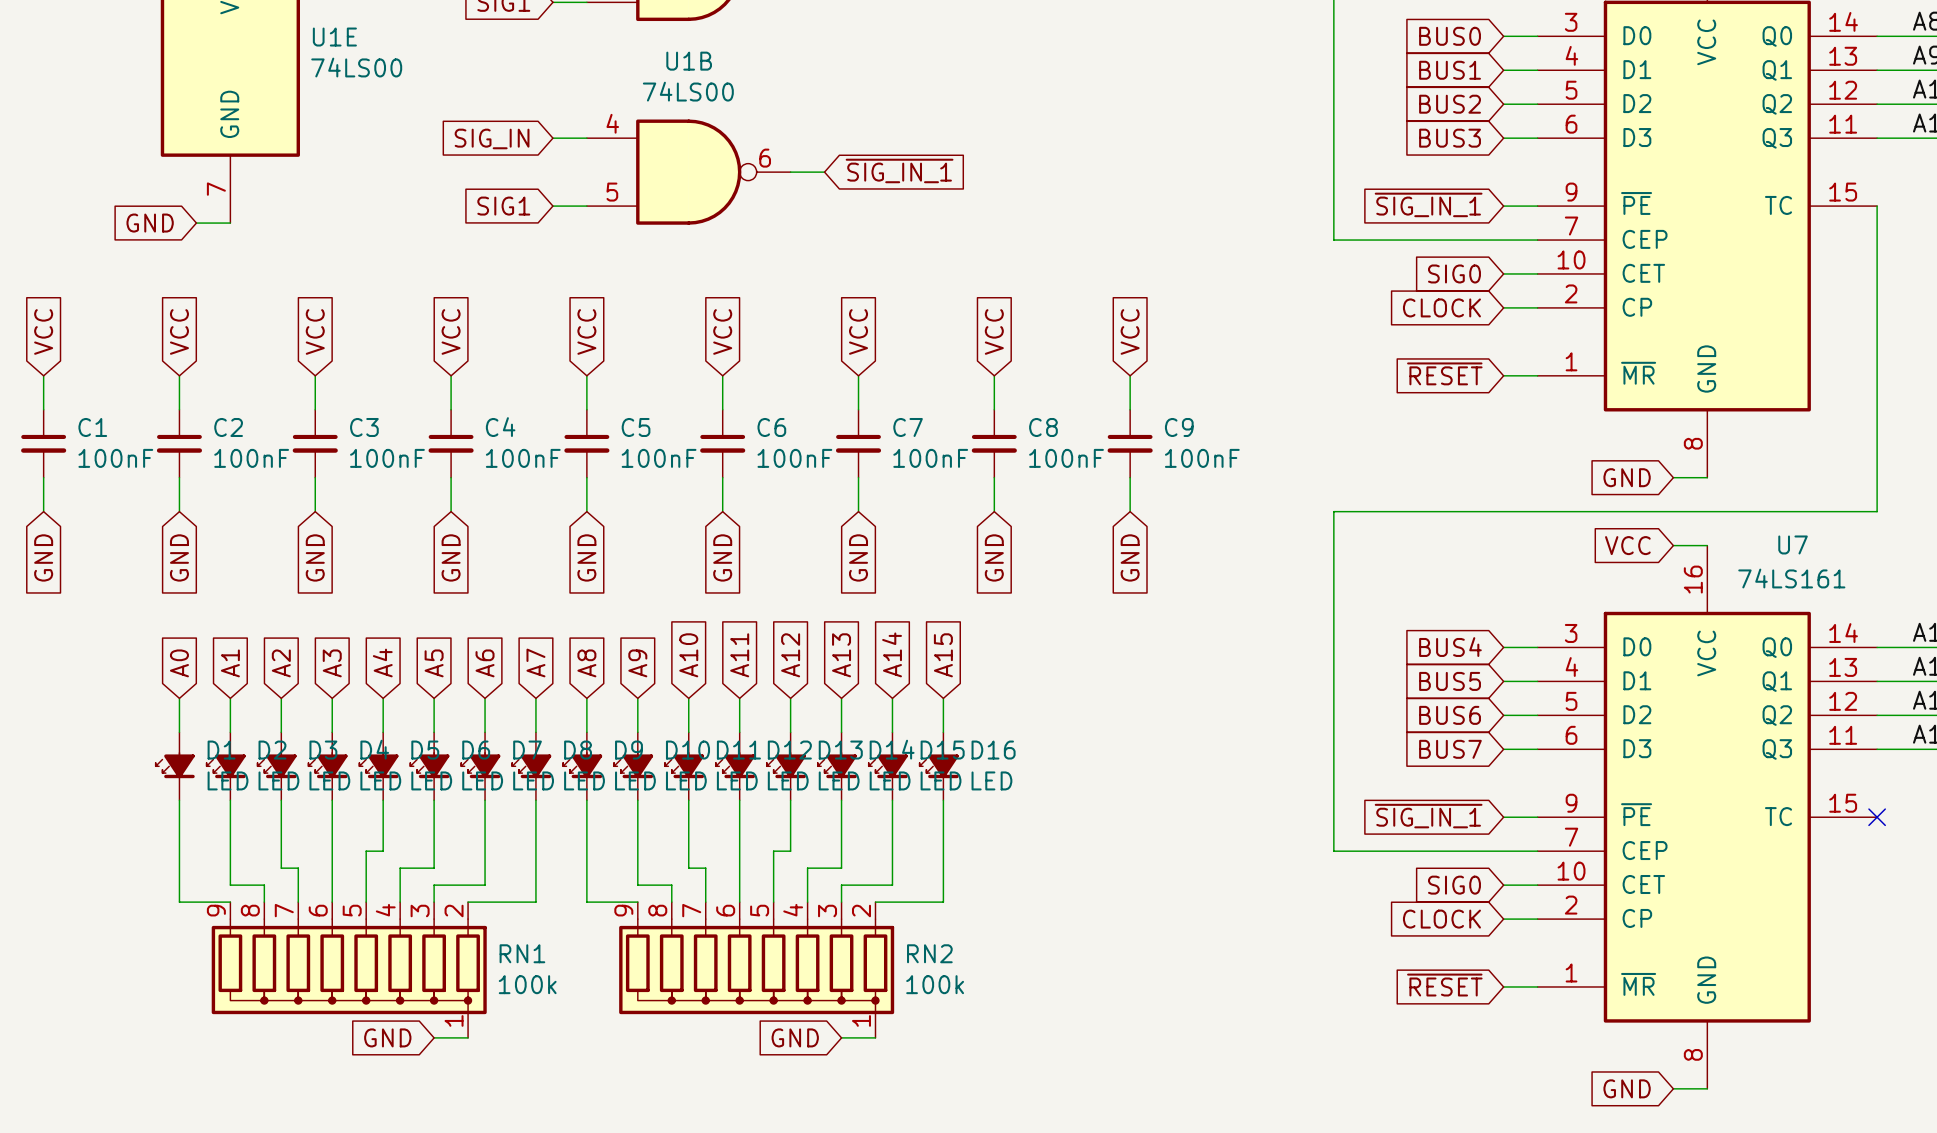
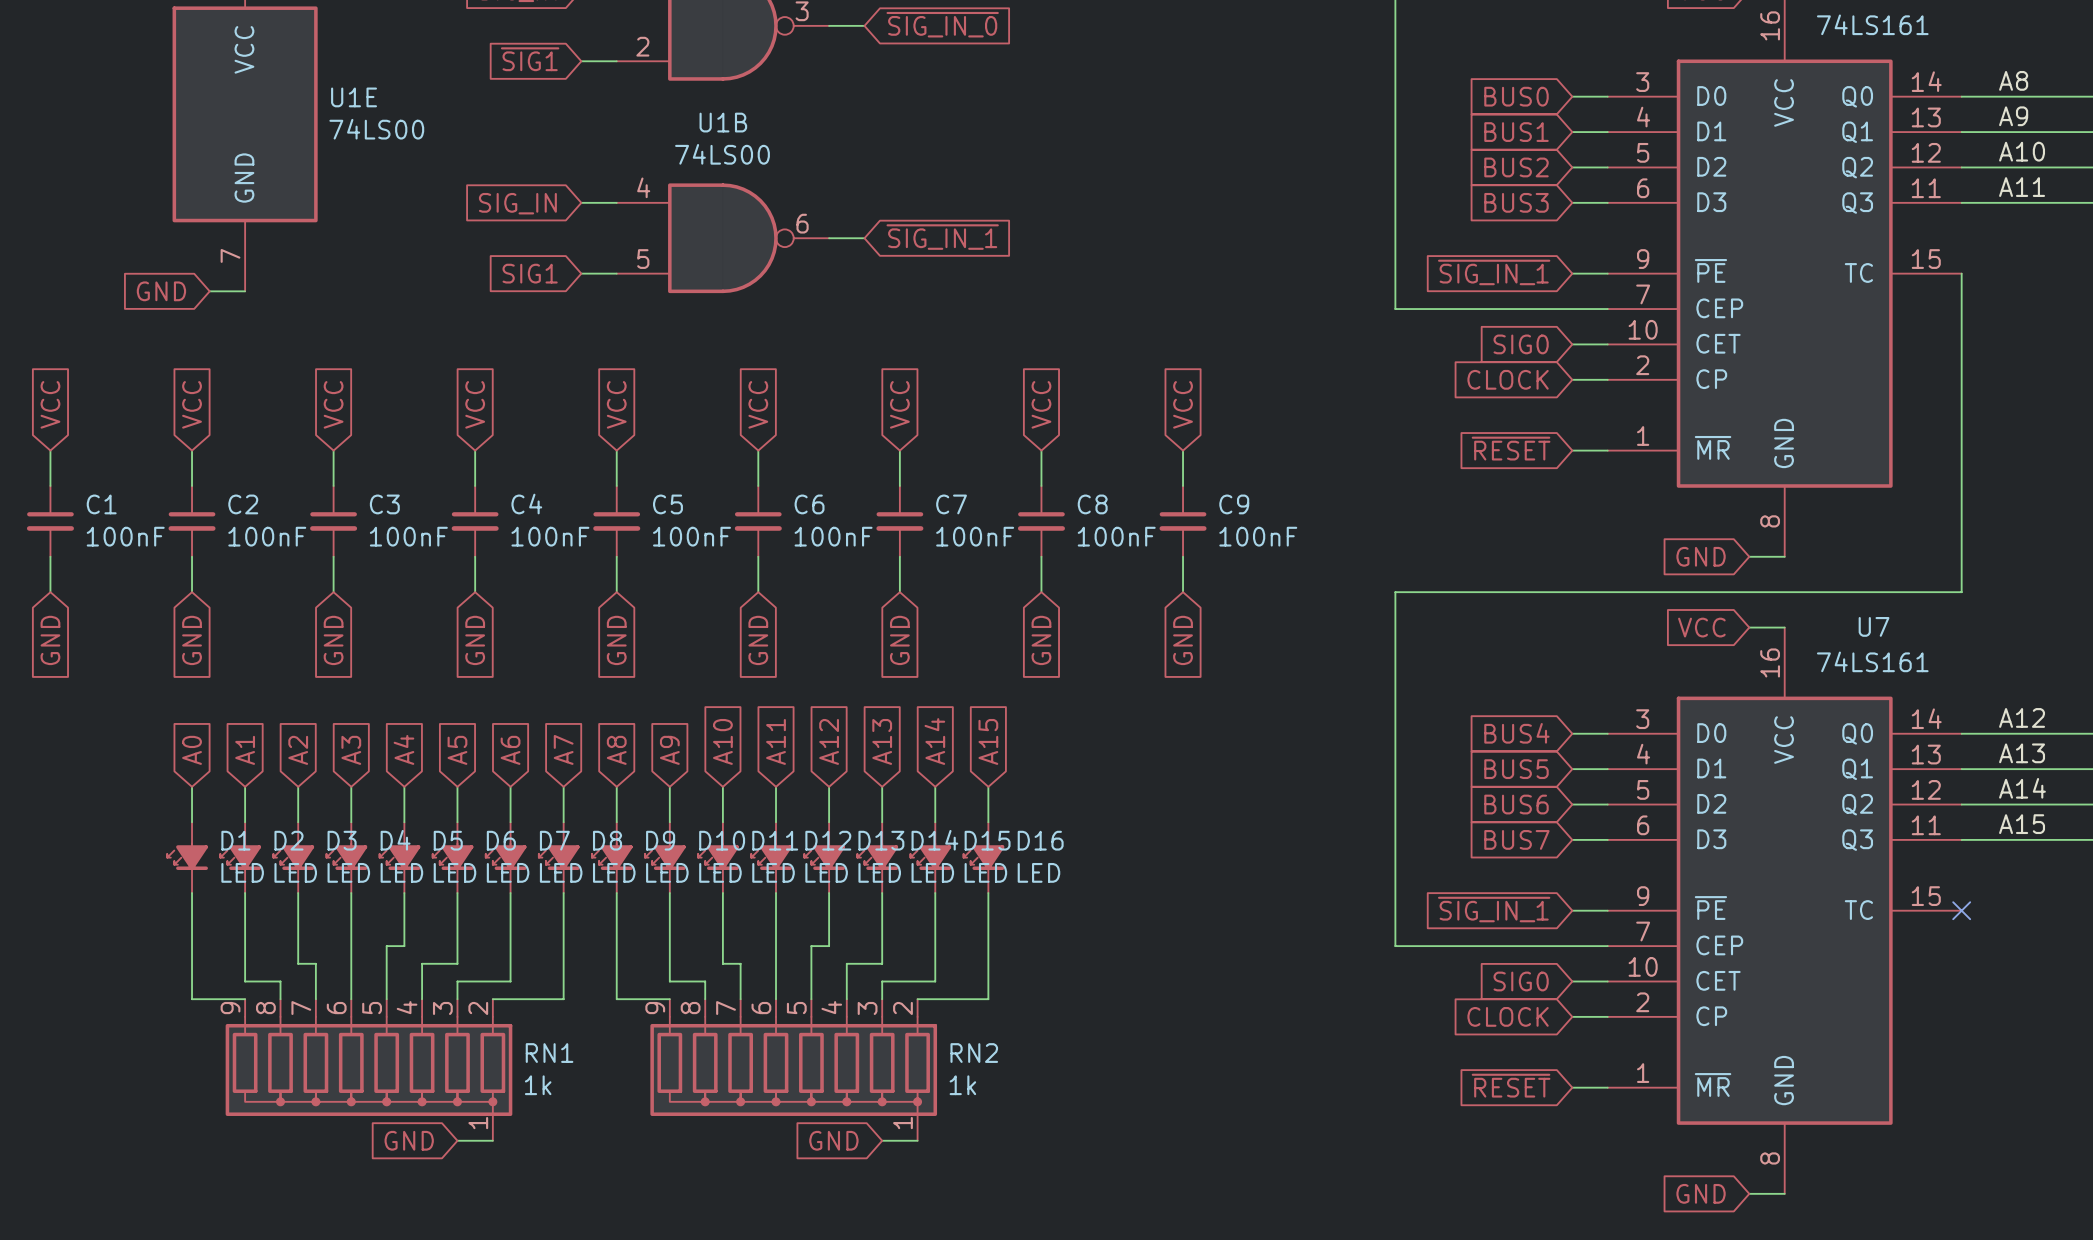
RN1 value: 100k (527, 984) -> 1k (538, 1085)
RN2 value: 100k (935, 984) -> 1k (962, 1085)

